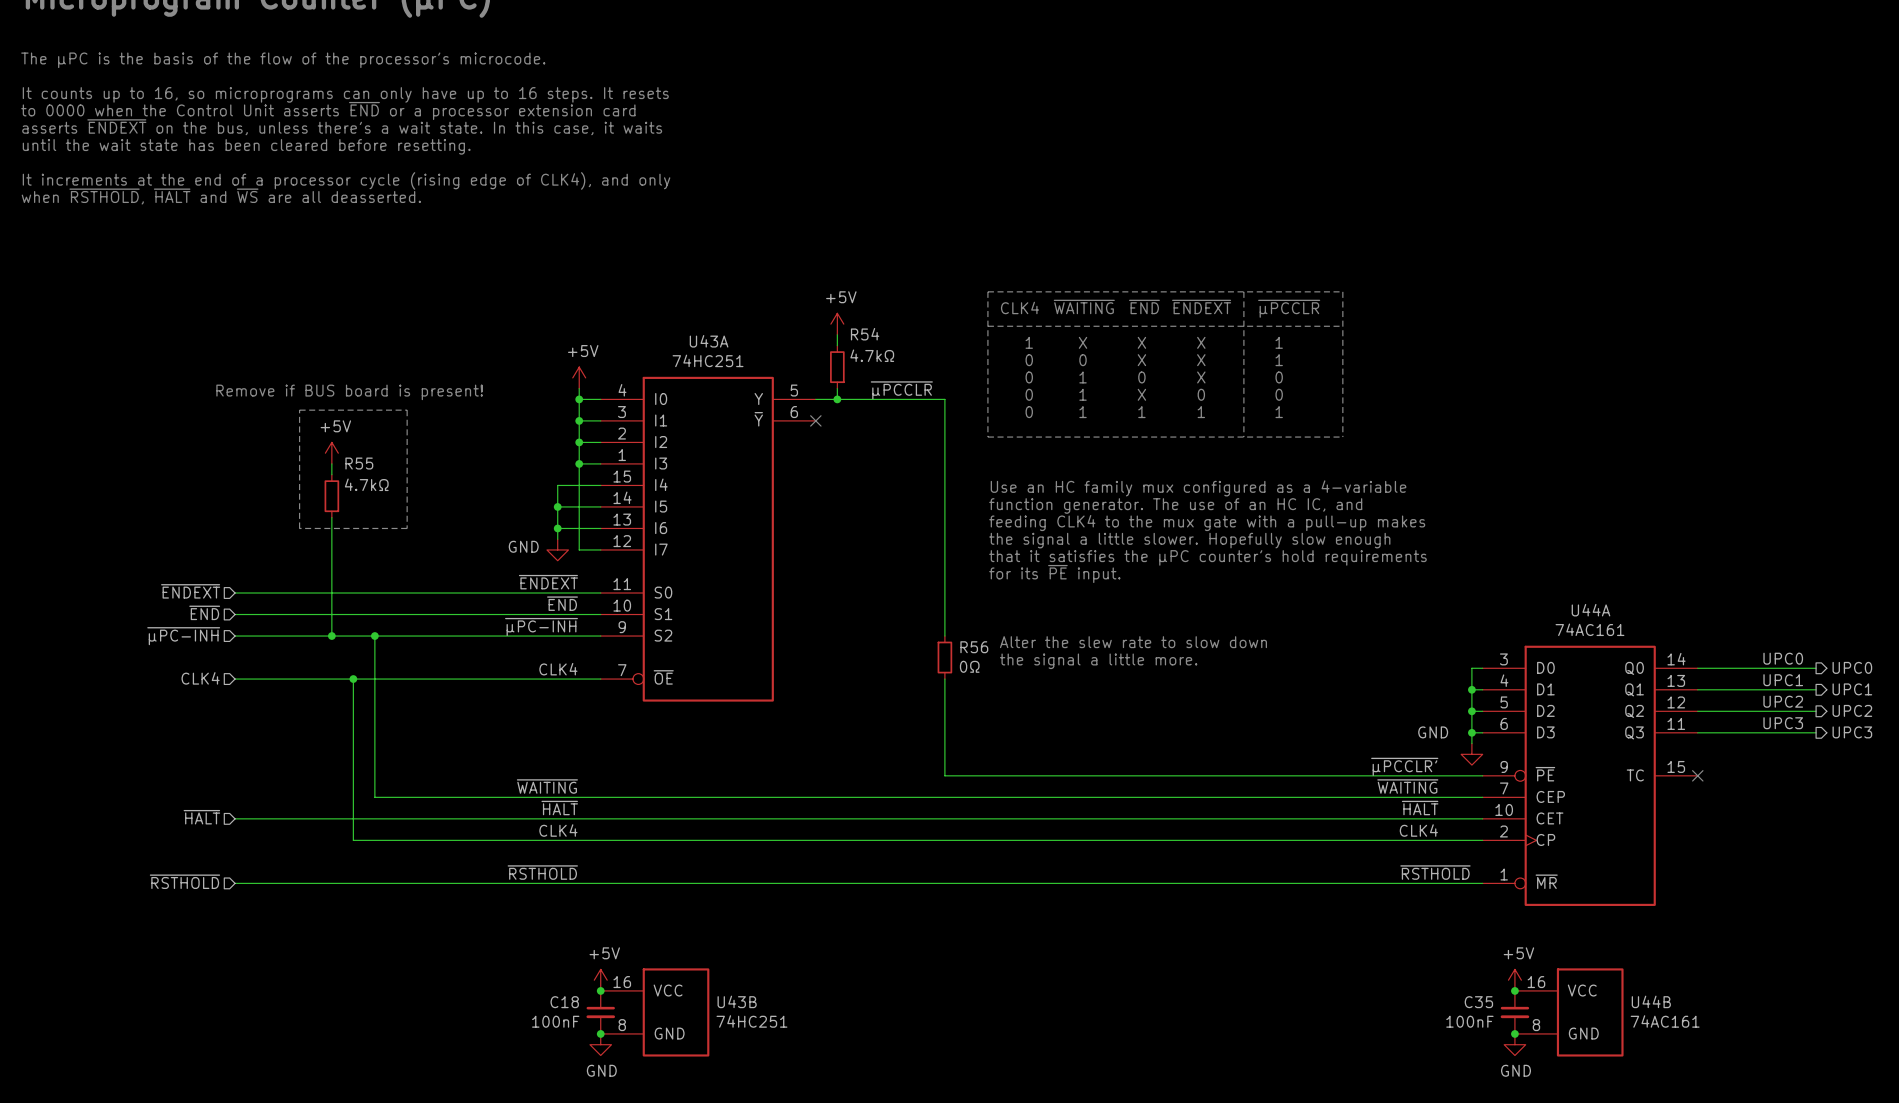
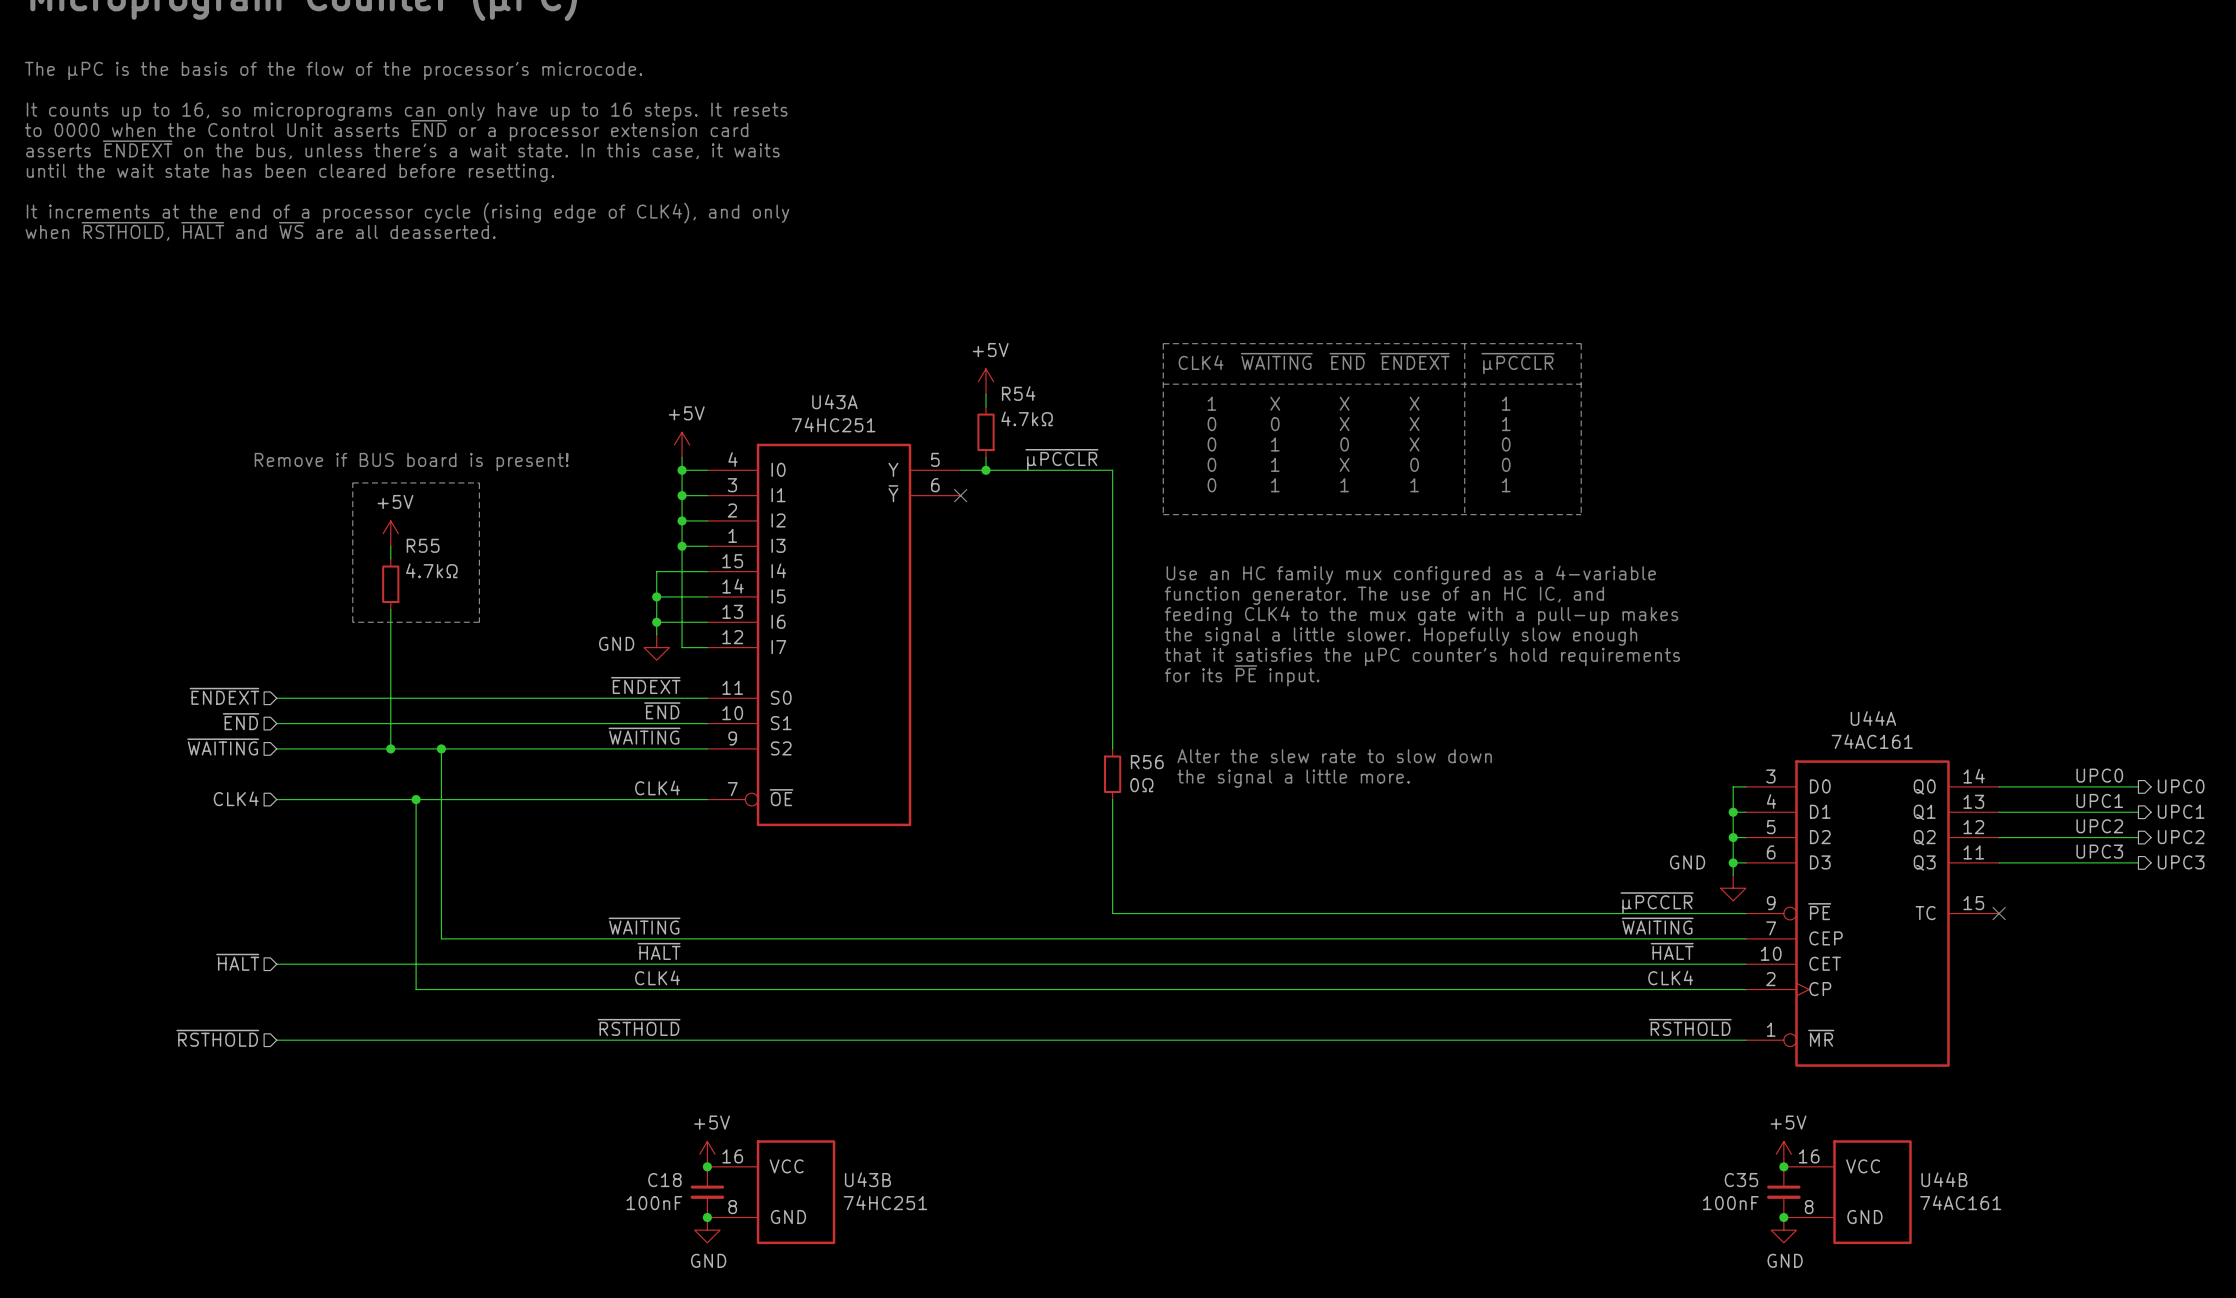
label: ~{µPC-INH} (541, 626) -> ~{WAITING} (644, 736)
hierarchical label: ~{µPC-INH} (183, 636) -> ~{WAITING} (223, 746)
label: ~{µPCCLR'} (1404, 766) -> ~{µPCCLR} (1657, 902)

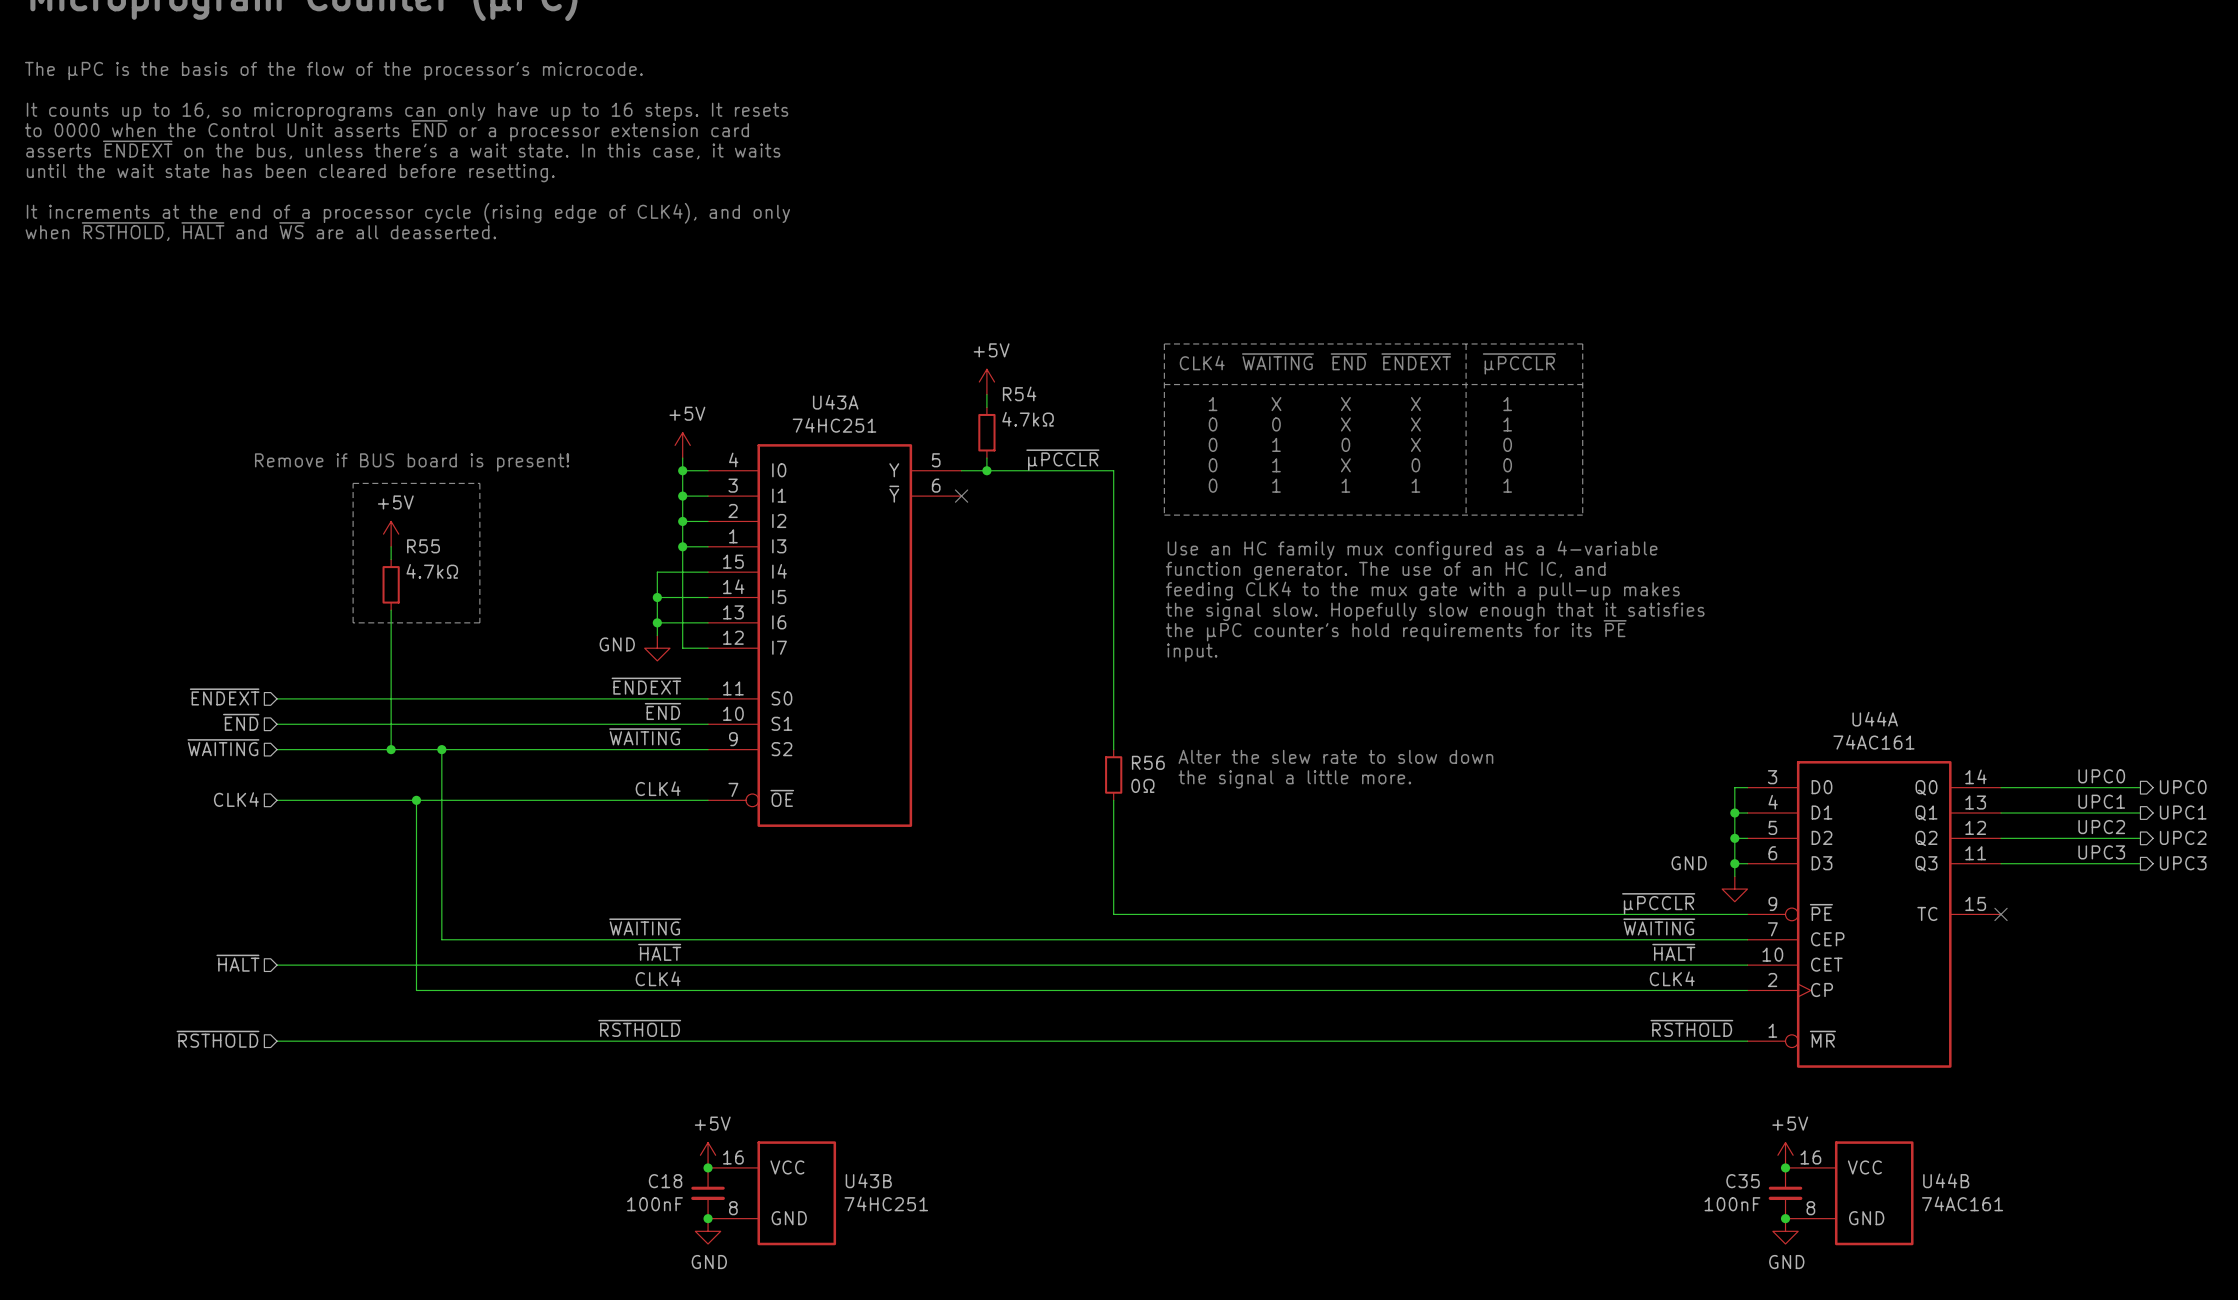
text: none -> Use an HC family mux configured as a 4-variable (1412, 550)
text: Use an HC family mux configured as a 4-variable (1411, 575) -> function generator. The use of an HC IC, and (1385, 570)
text: function generator. The use of an HC IC, and (1384, 595) -> feeding CLK4 to the mux gate with a pull-up makes (1422, 591)
text: feeding CLK4 to the mux gate with a pull-up makes (1421, 615) -> the signal slow. Hopefully slow enough that it satisfies (1435, 611)
text: the signal a little slower. Hopefully slow enough (1401, 636) -> the µPC counter's hold requirements for its ~{PE} (1396, 630)
text: that it satisfies the µPC counter's hold requirements (1422, 656) -> input. (1192, 652)
text: for its ~{PE} input. (1242, 675) -> none

